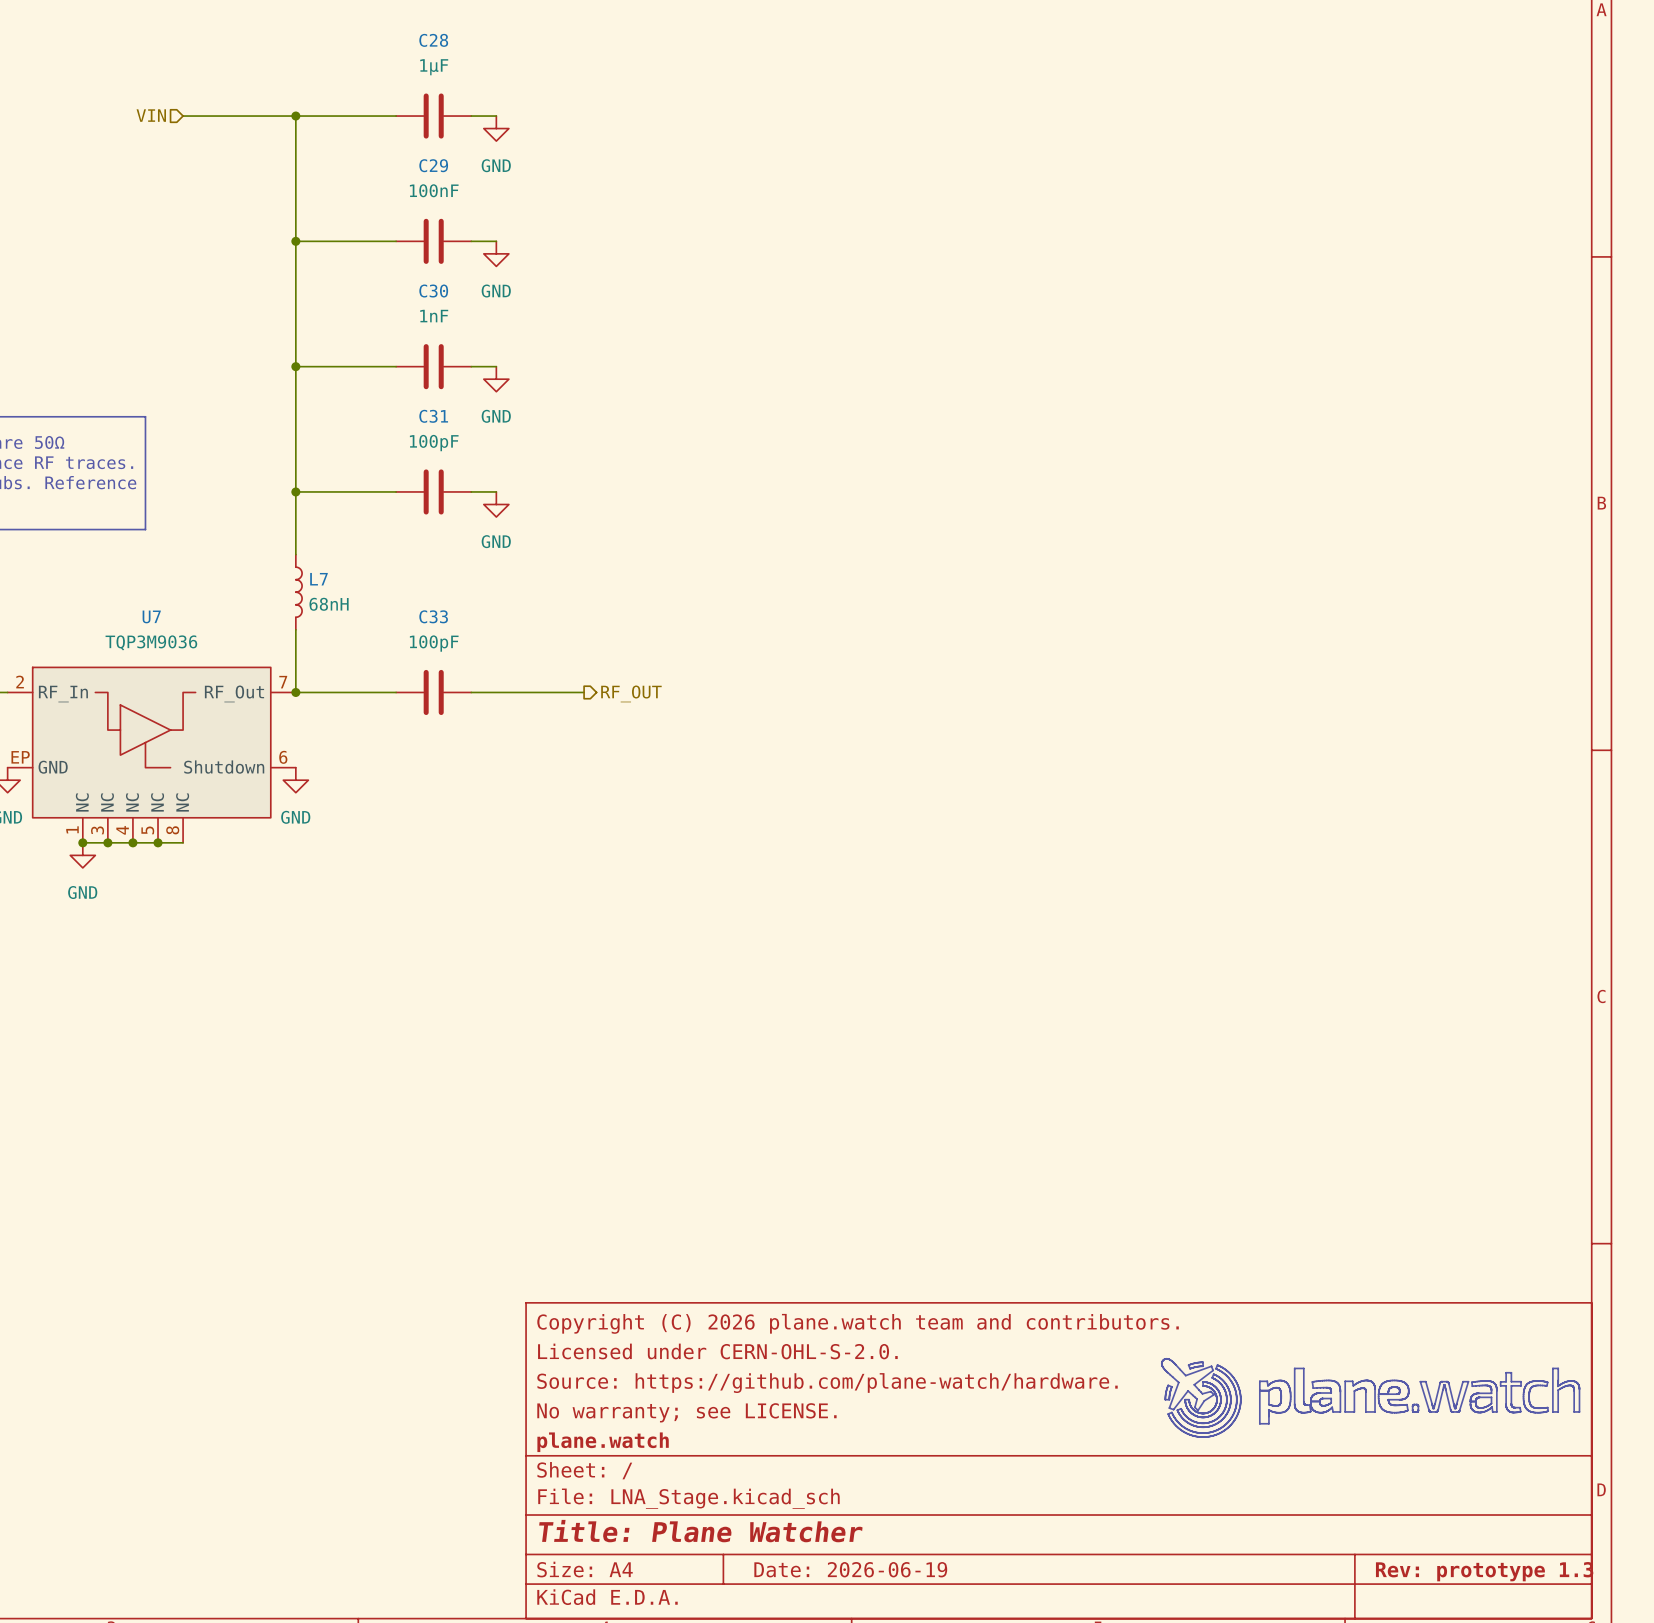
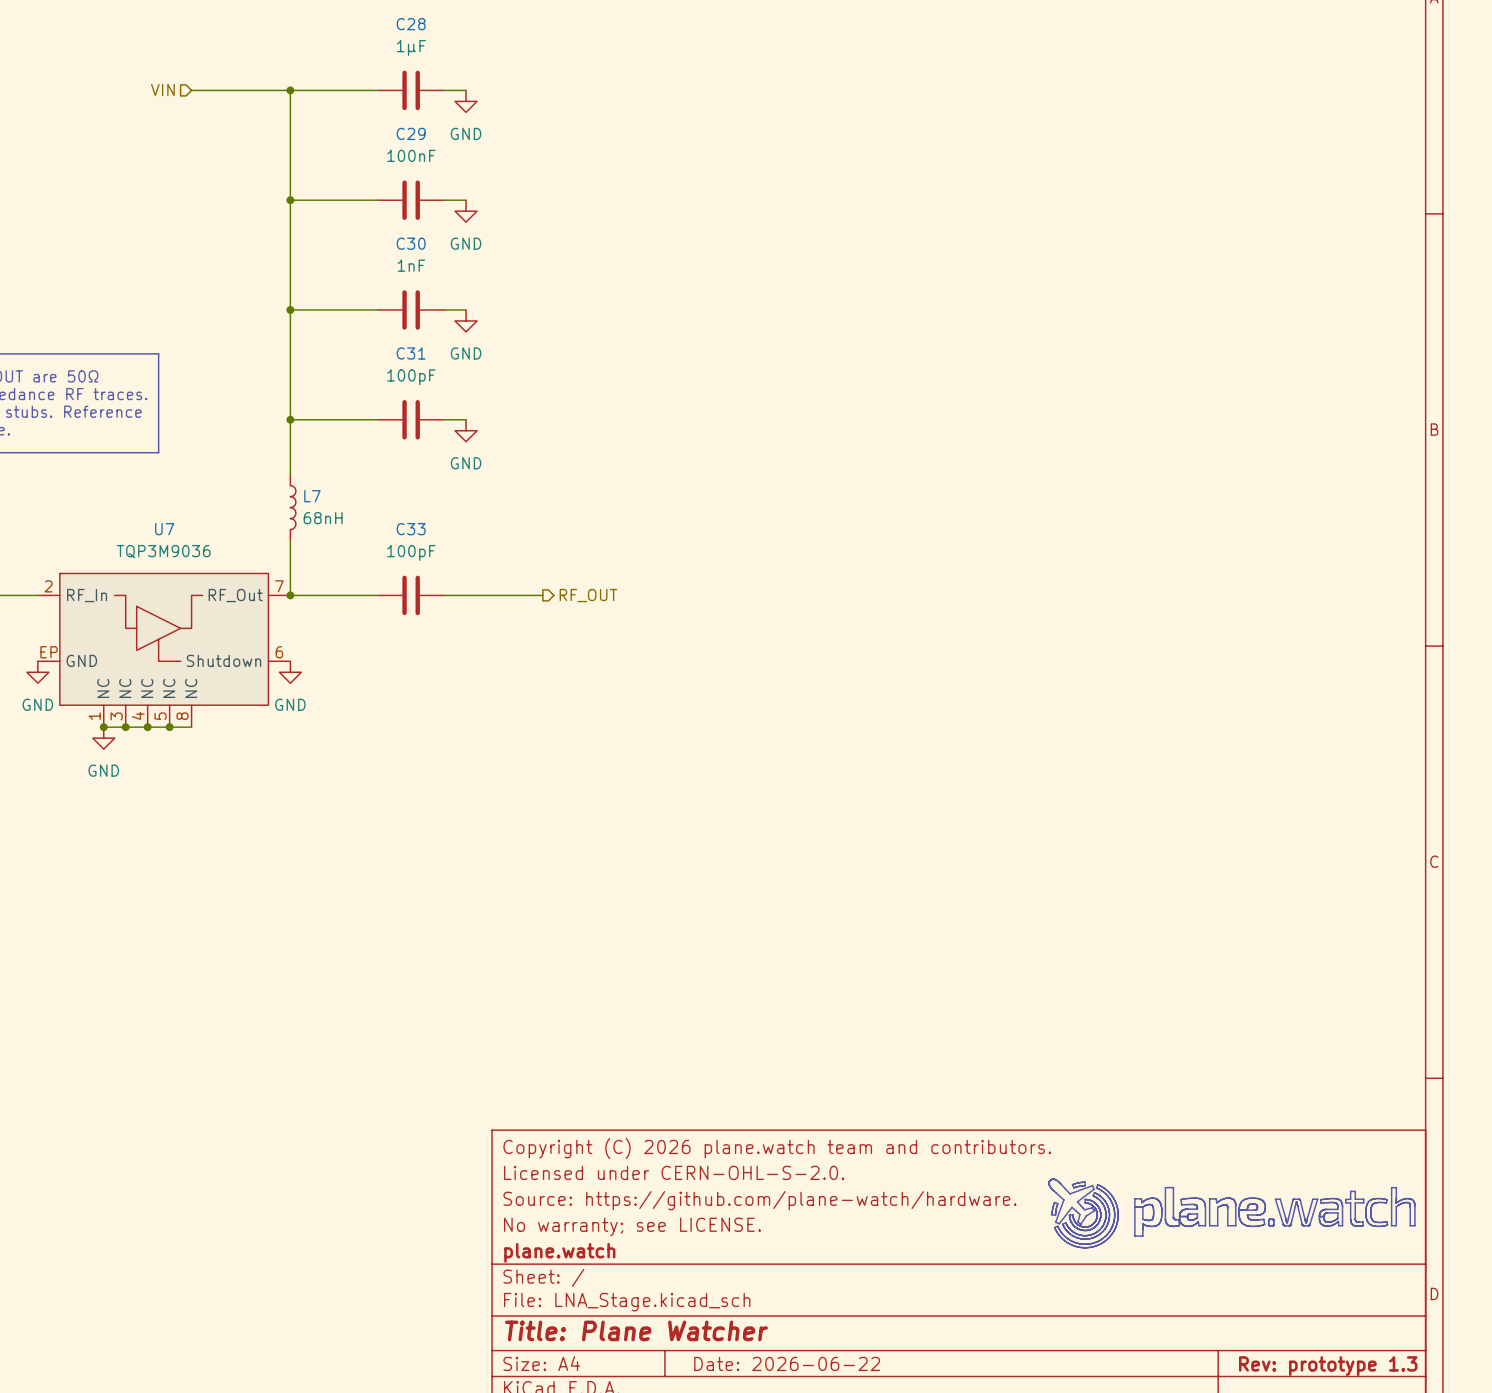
title block: Date: 2026-06-19 (850, 1569) -> Date: 2026-06-22 (787, 1363)

